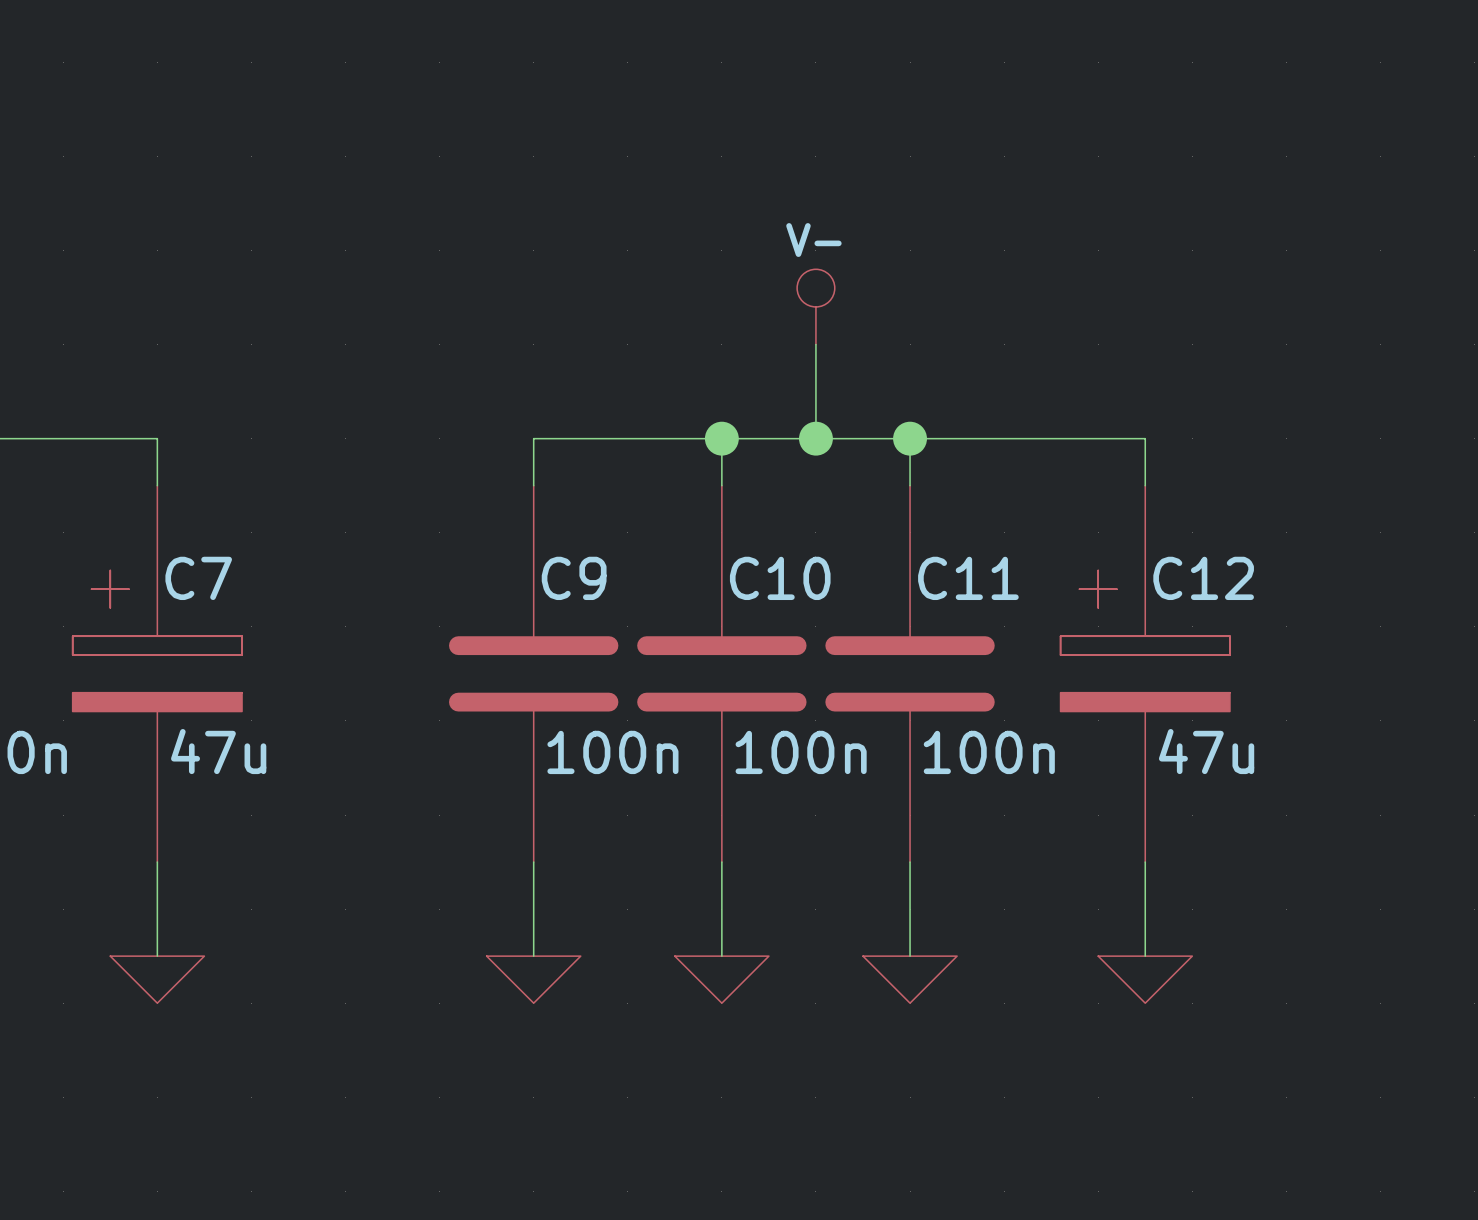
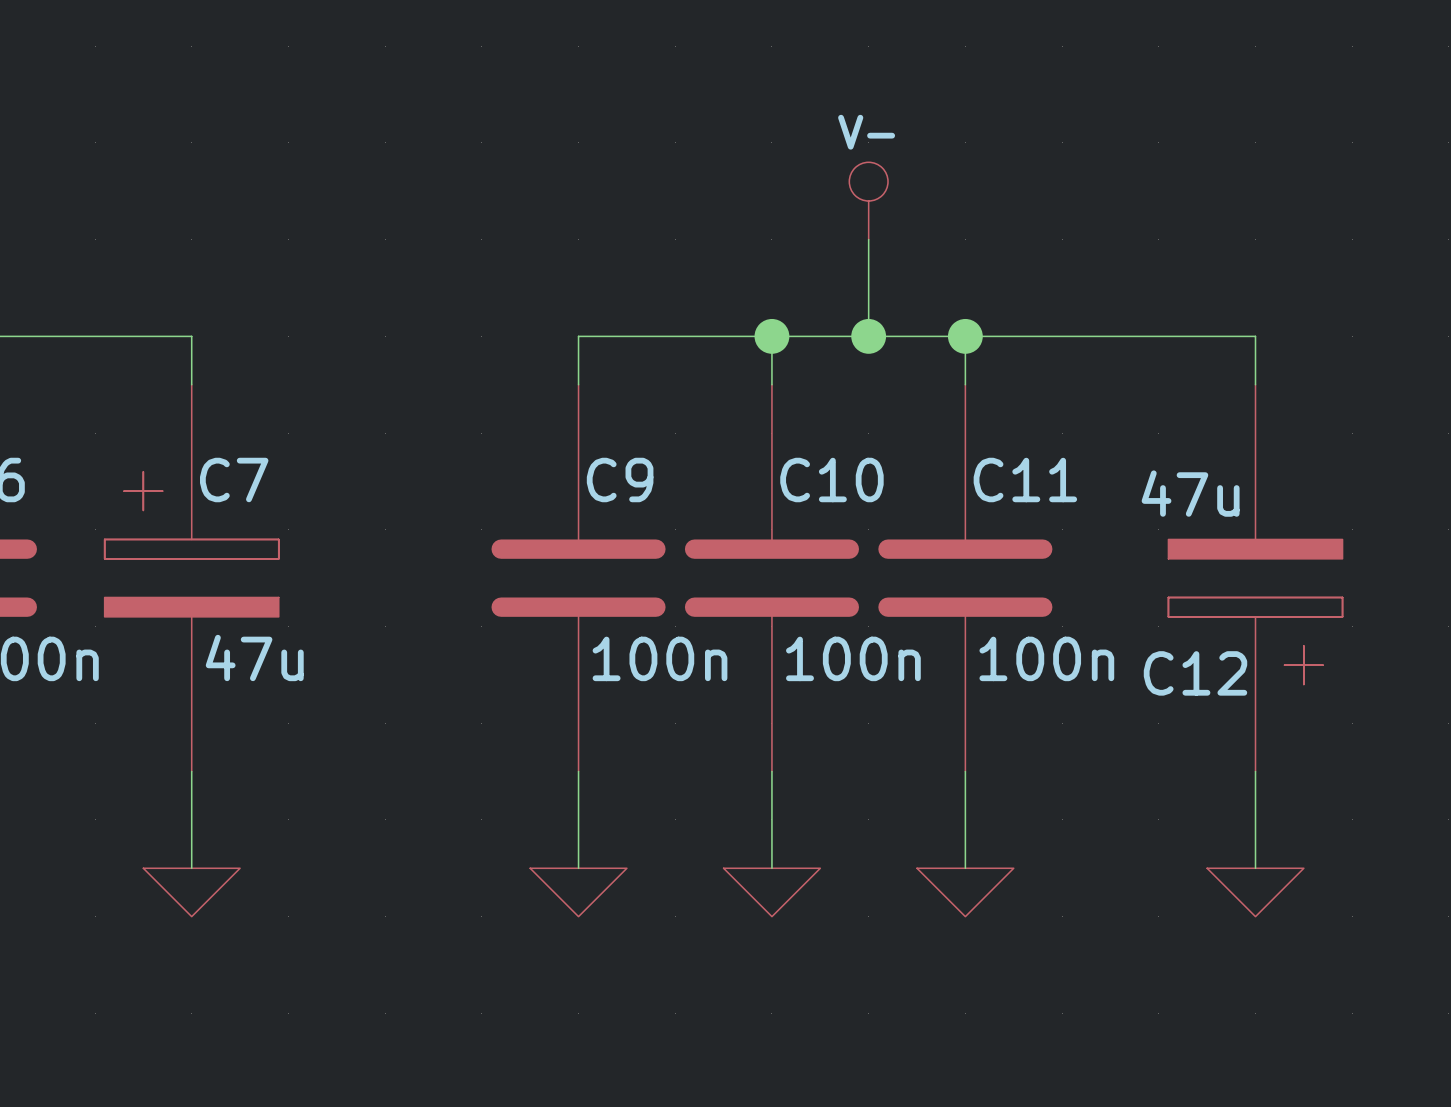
wire: (1145, 438) (1145, 485) -> (1207, 336) (1255, 336) (1255, 384)
C12 rotation: 0° (1145, 640) -> 180° (1255, 612)
wire: (1145, 862) (1145, 956) -> (1255, 771) (1255, 868)
power symbol position: (1145, 979) -> (1255, 892)

